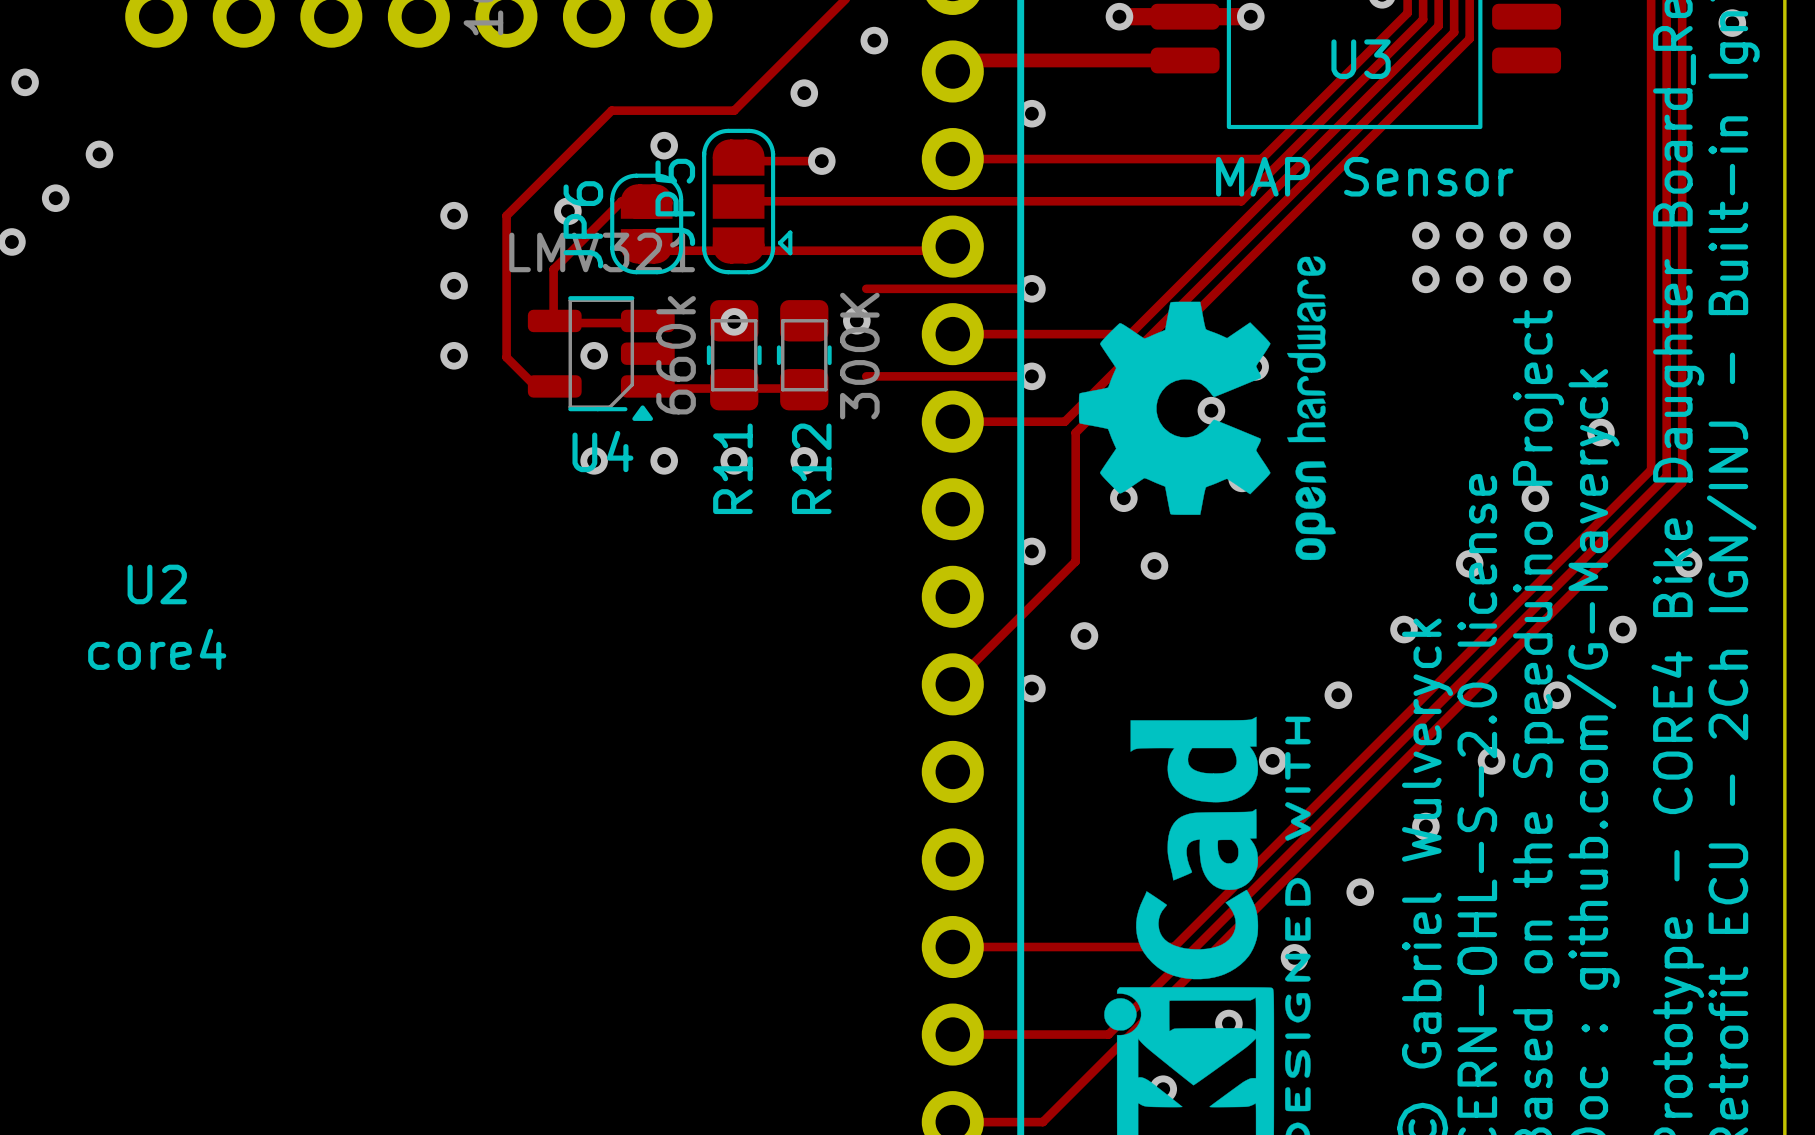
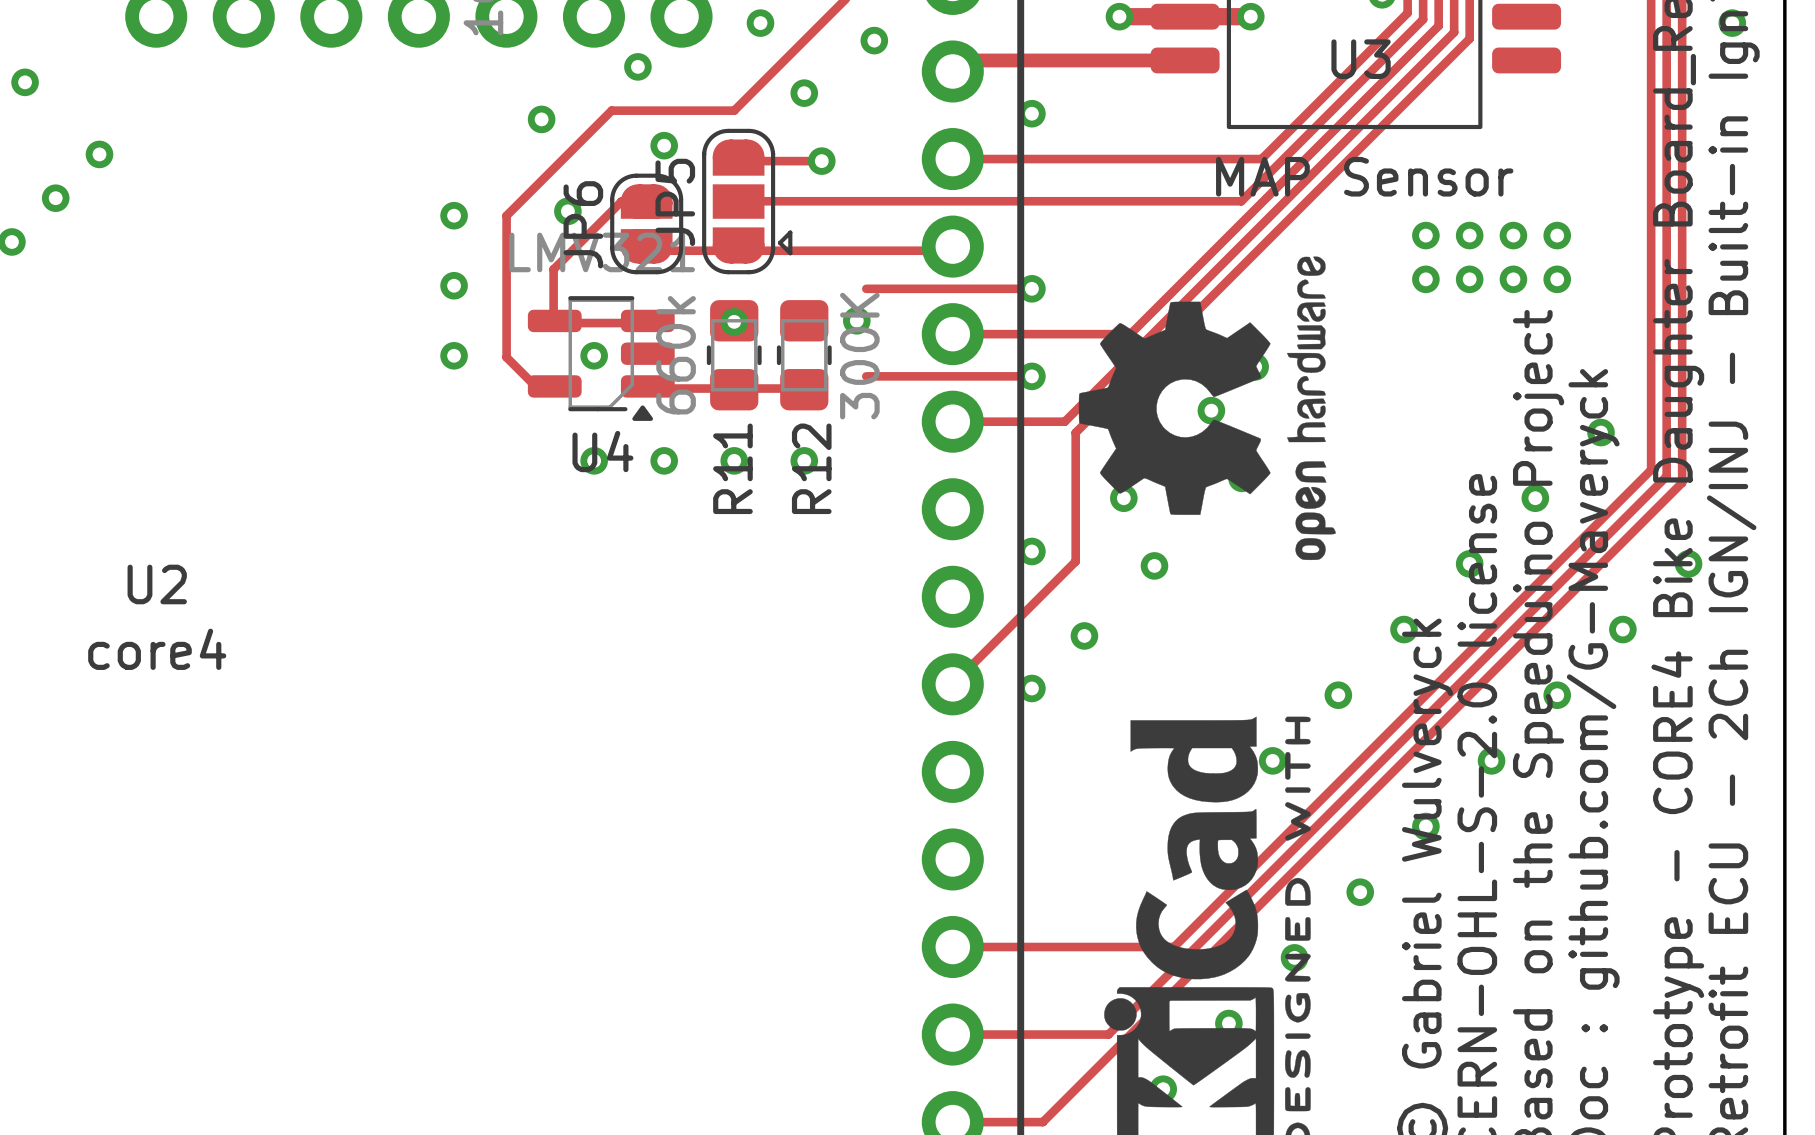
via: none -> (760, 23)
via: none -> (637, 66)
via: none -> (541, 119)

